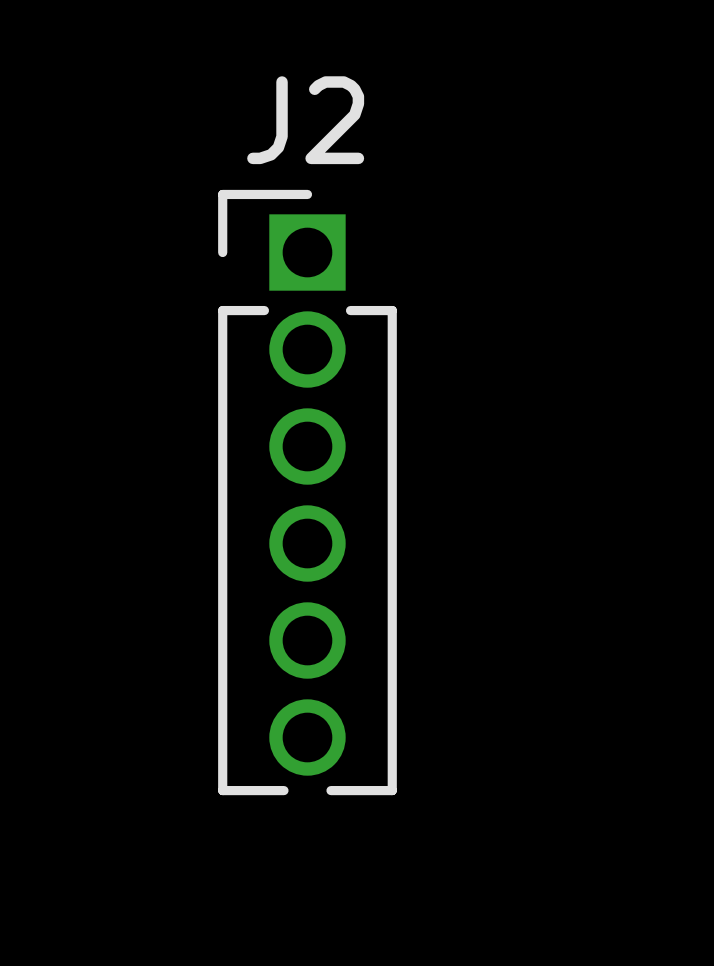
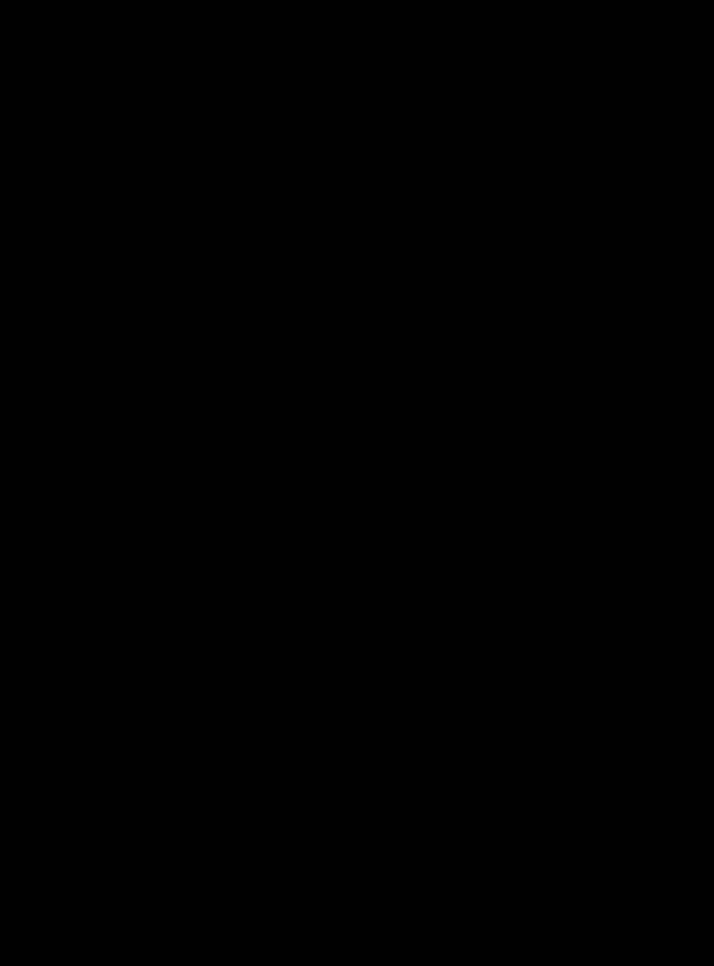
J2: (307, 492) -> none

